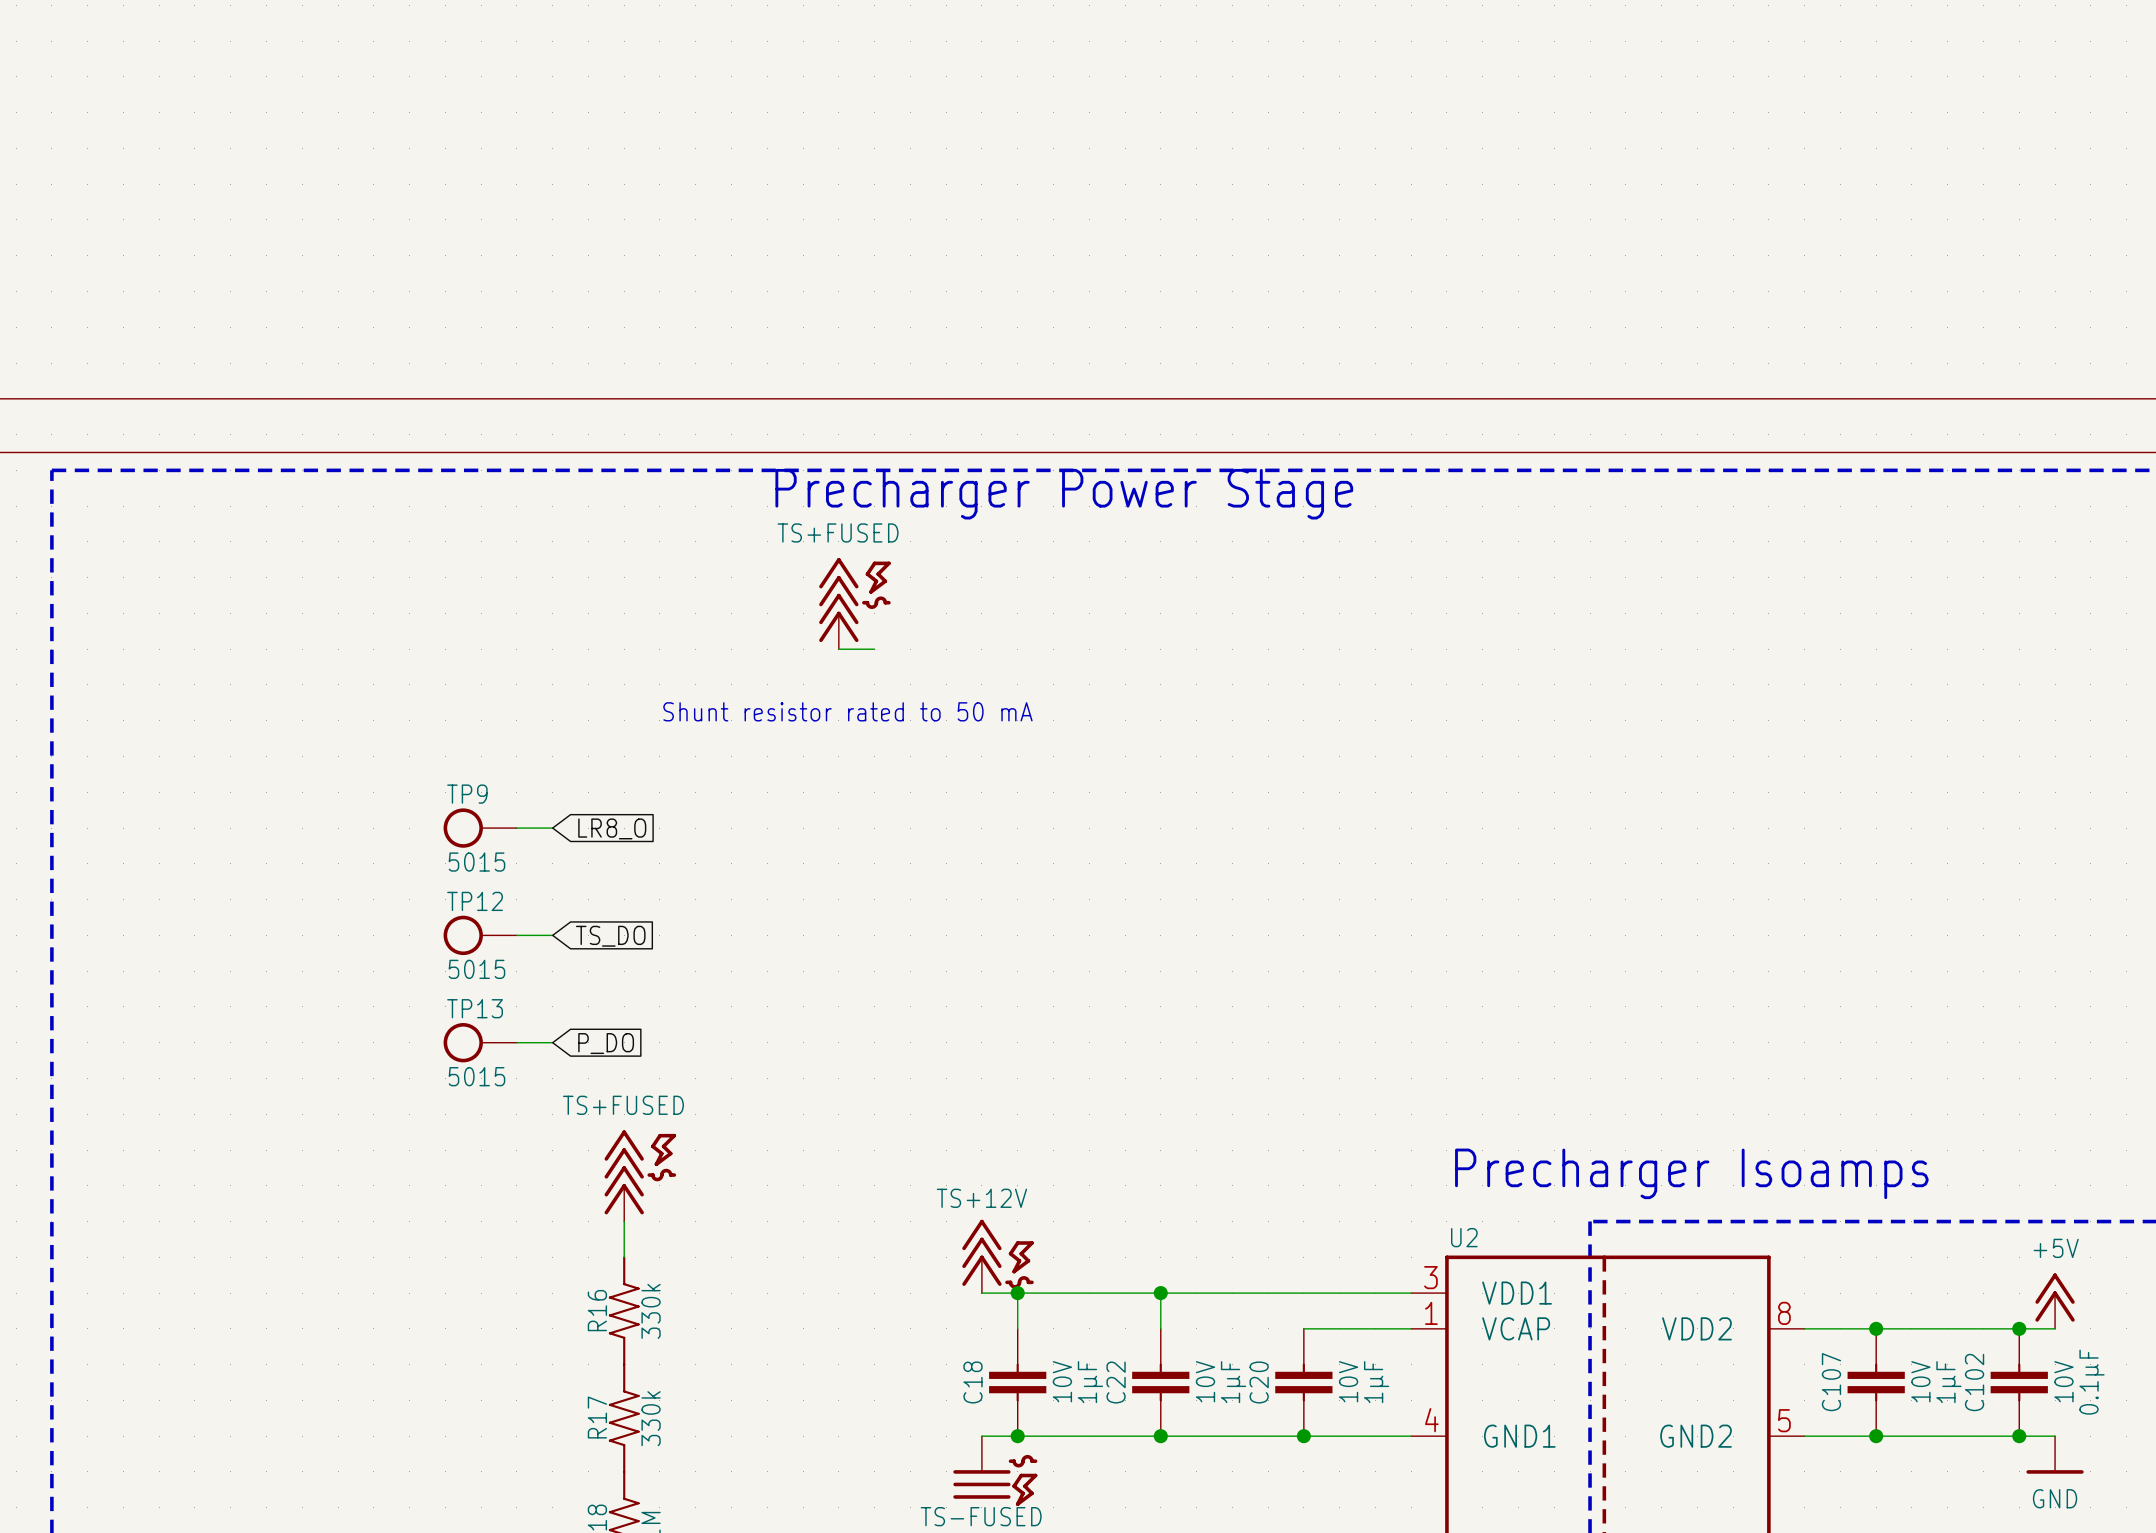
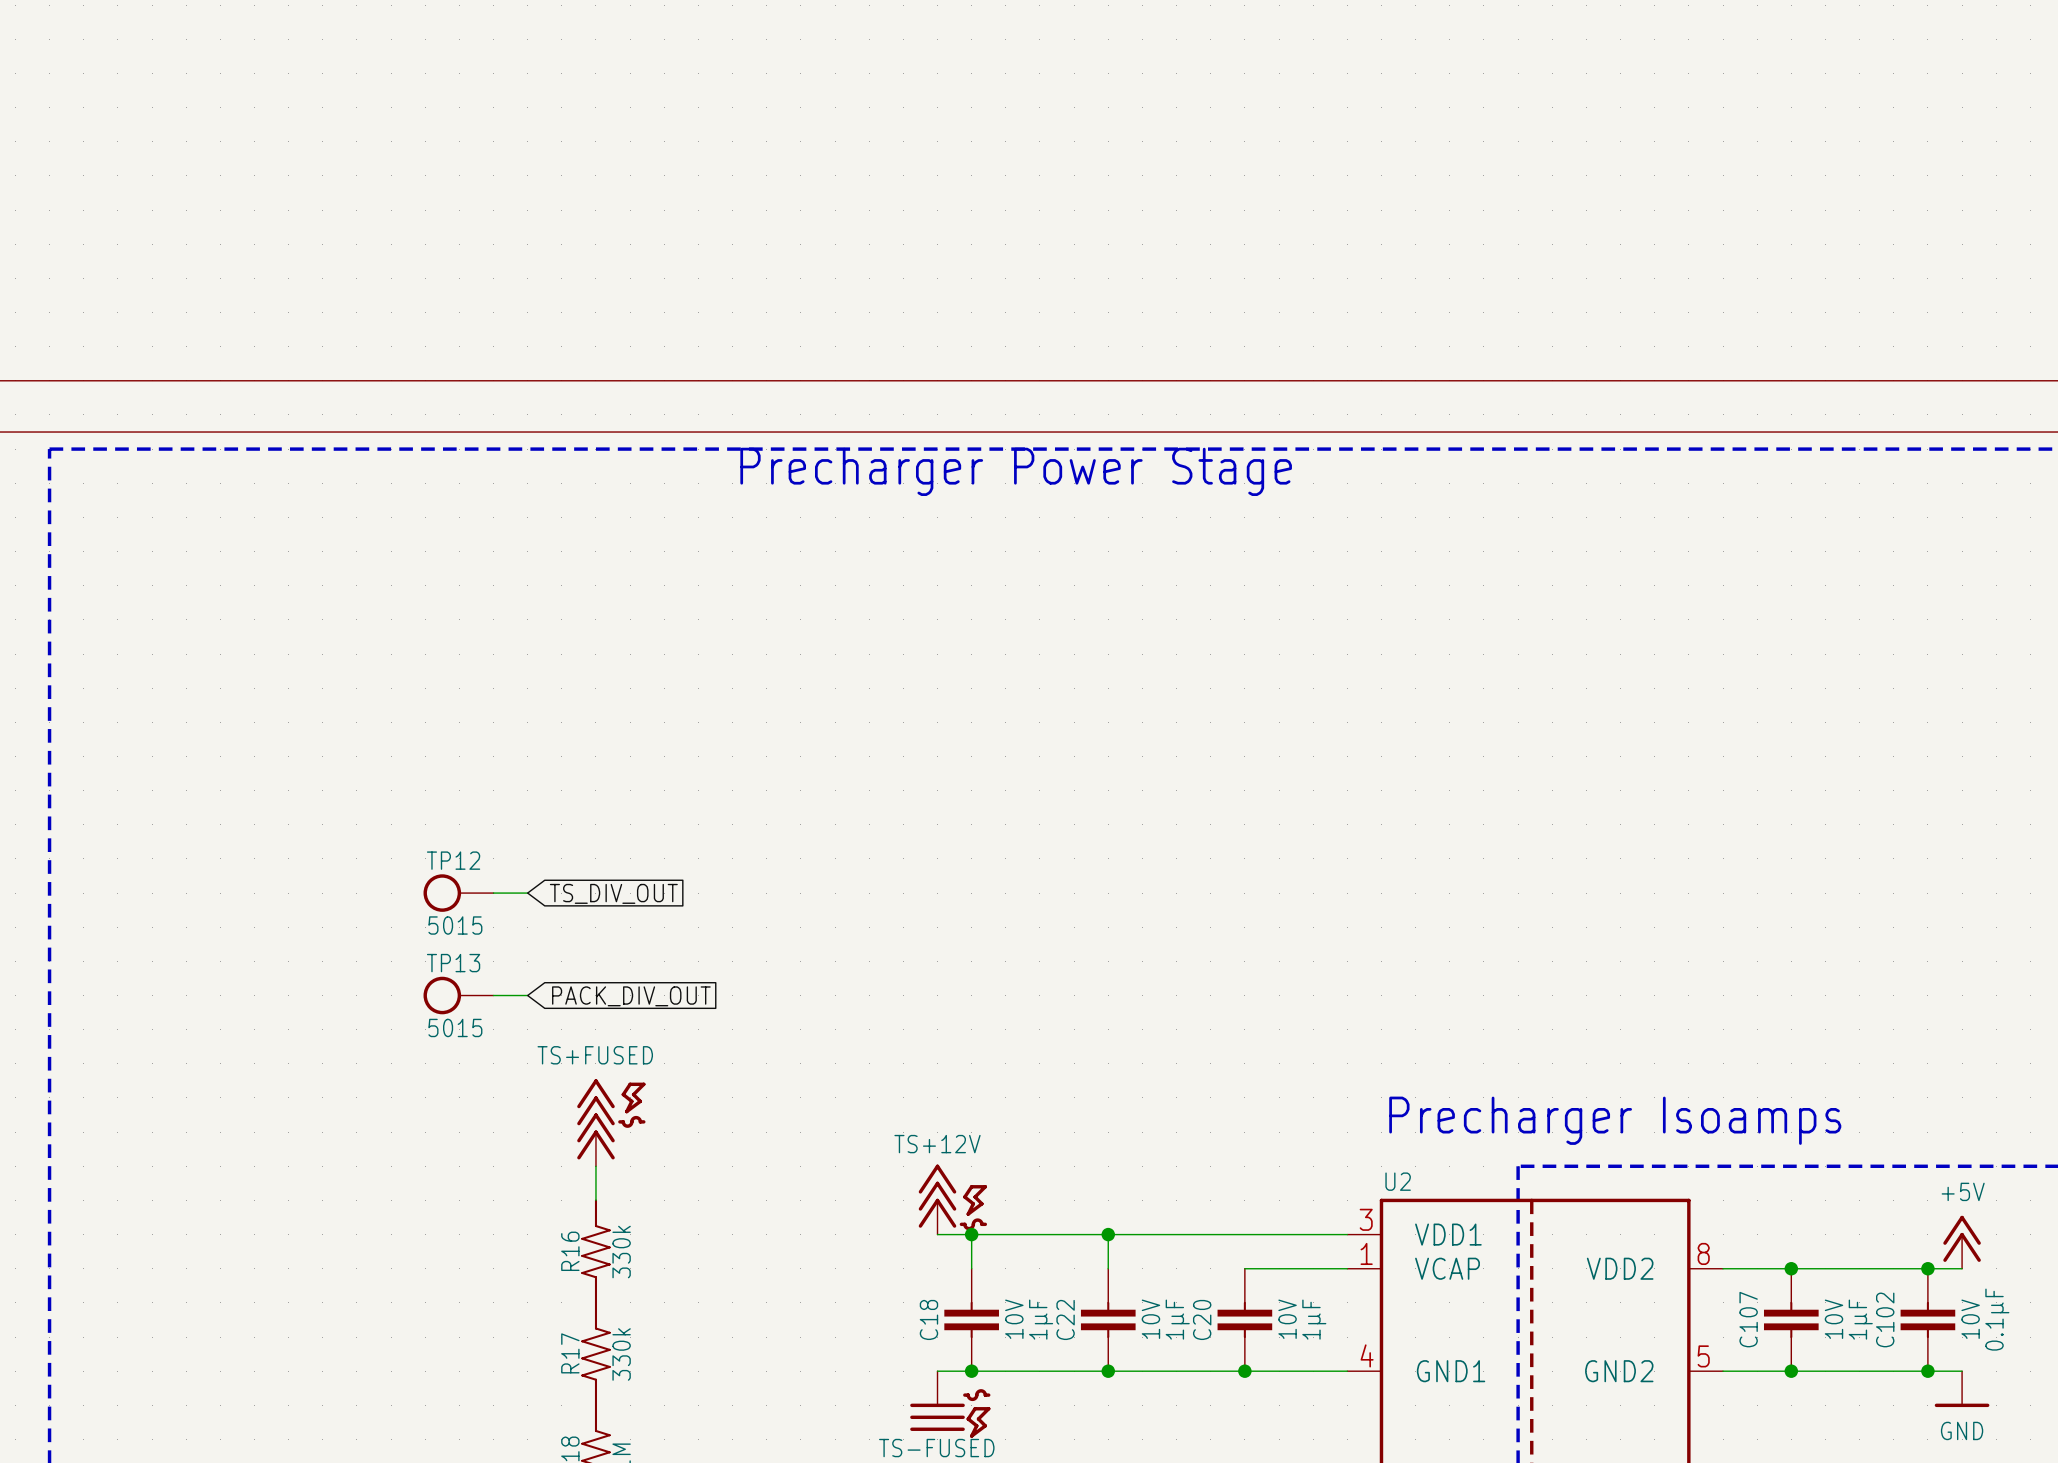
power symbol: TS+FUSED (854, 603) -> none
wire: (838, 649) (874, 649) -> none
text: Shunt resistor rated to 50 mA (847, 711) -> none
TP9: (480, 828) -> none
wire: (516, 828) (552, 828) -> none
global label: LR8_O (612, 828) -> none
global label: TS_DO (610, 936) -> TS_DIV_OUT (613, 893)
global label: P_DO (606, 1043) -> PACK_DIV_OUT (631, 996)

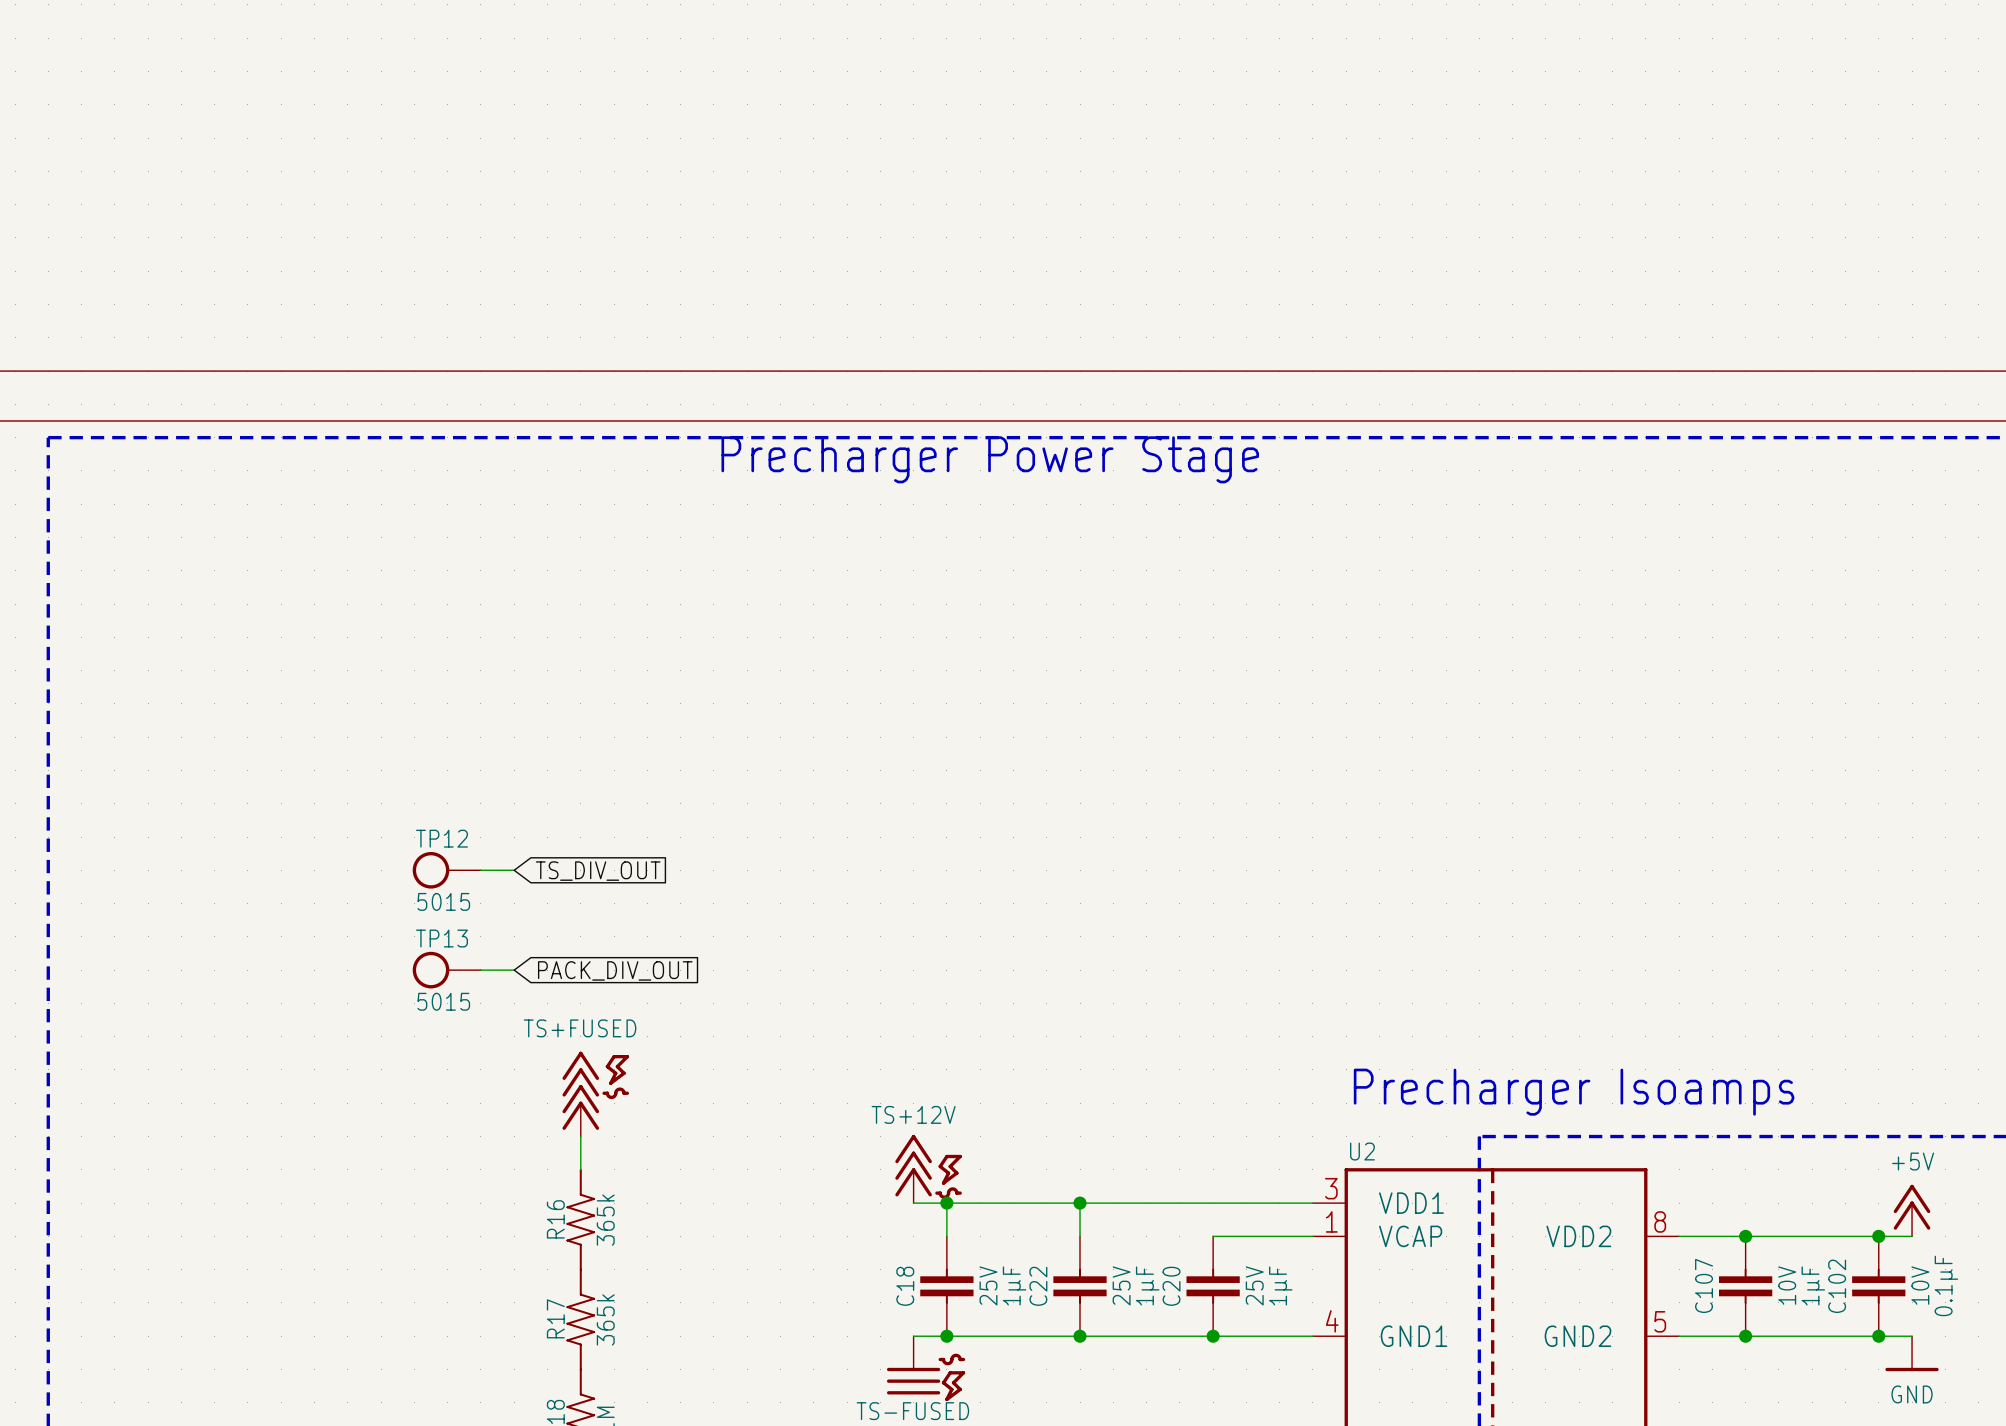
R16 text: 330k (621, 1252) -> 365k (605, 1220)
C18 text: 10V (1014, 1319) -> 25V (988, 1285)
C22 text: 10V (1150, 1319) -> 25V (1121, 1285)
C20 text: 10V (1287, 1319) -> 25V (1254, 1285)
R17 text: 330k (621, 1354) -> 365k (605, 1319)

